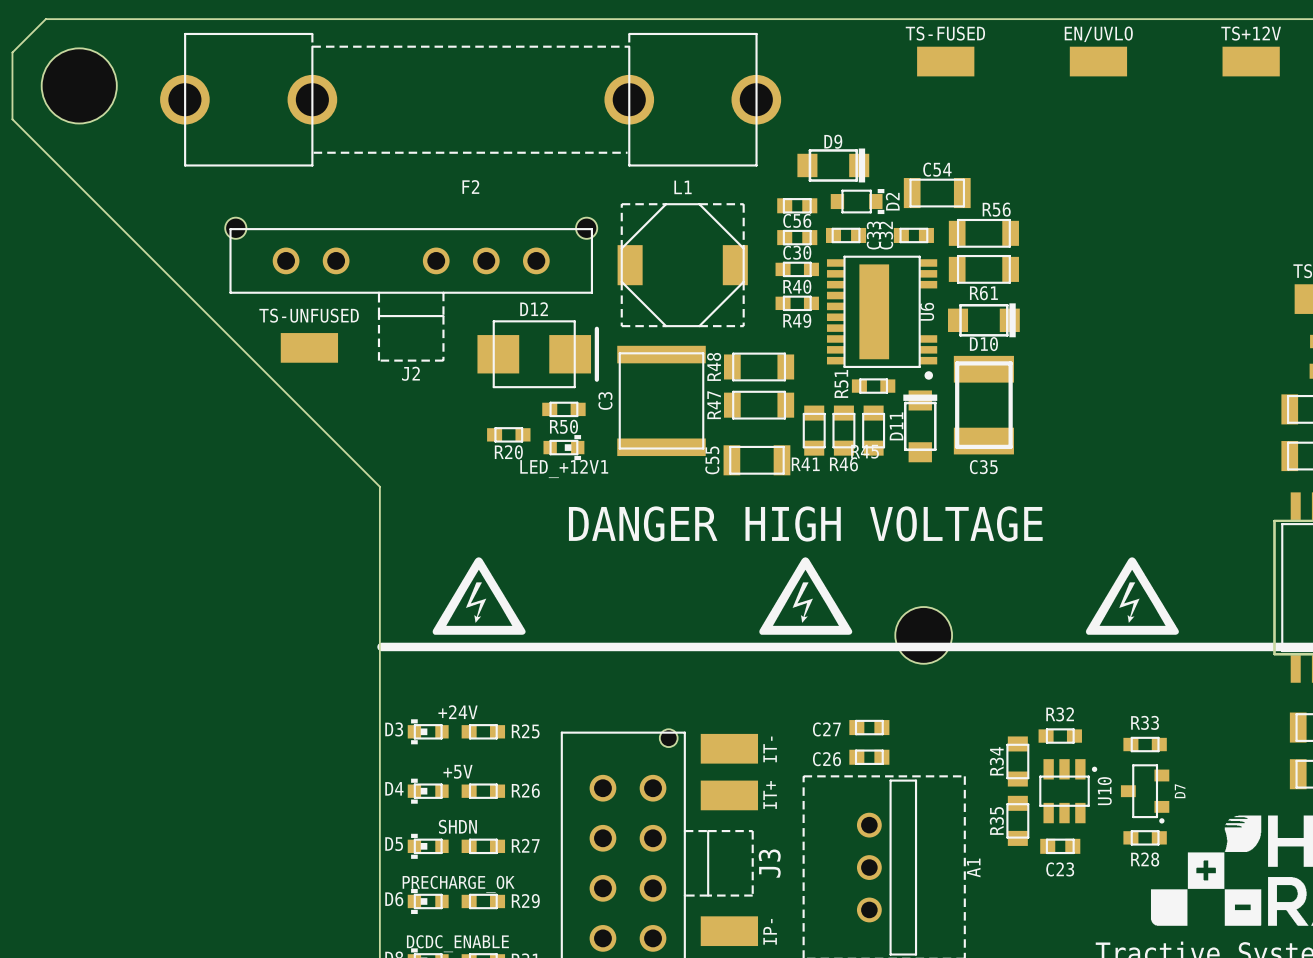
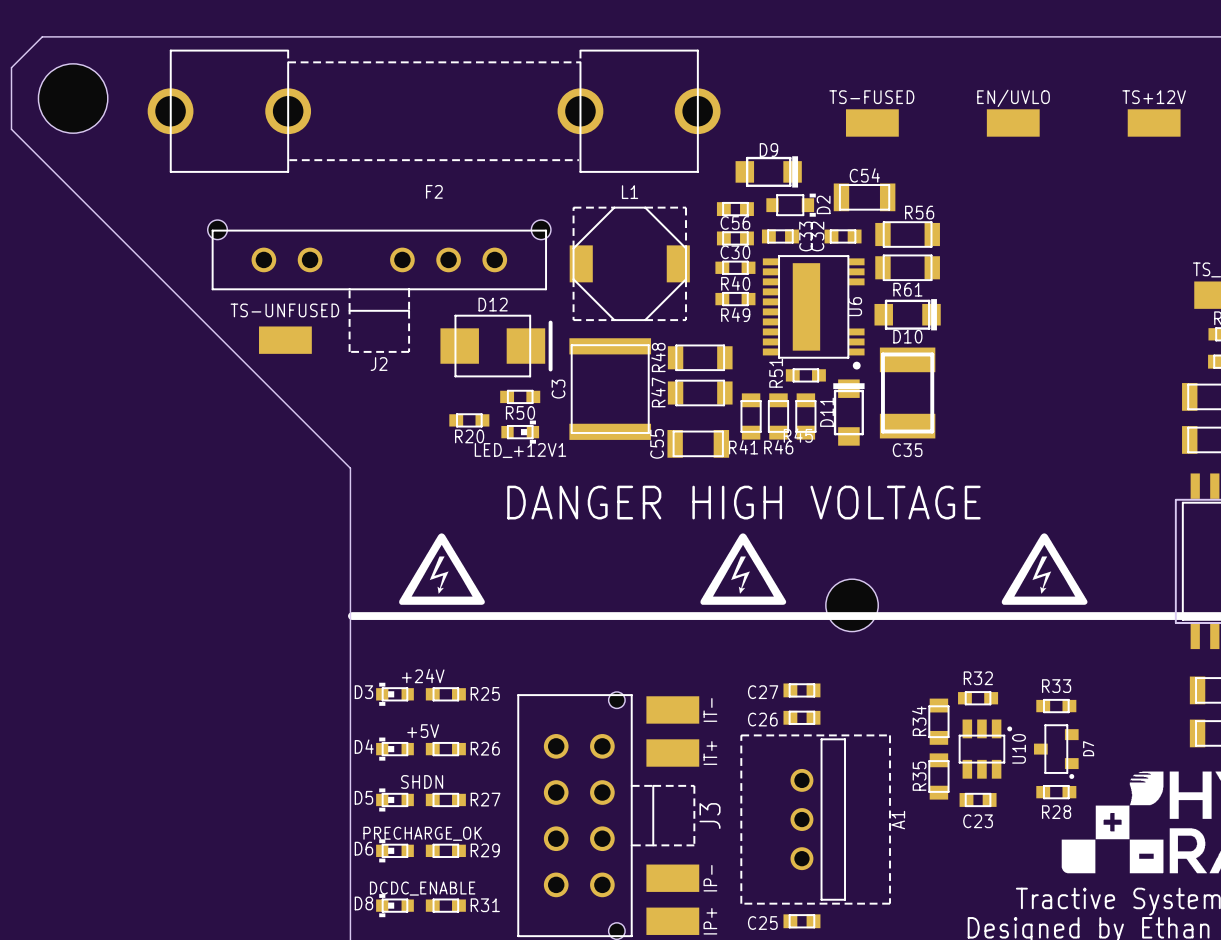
TS-FUSED position: (945, 61) -> (872, 122)
EN/UVLO position: (1098, 61) -> (1013, 122)
TS+12V position: (1251, 61) -> (1154, 122)

